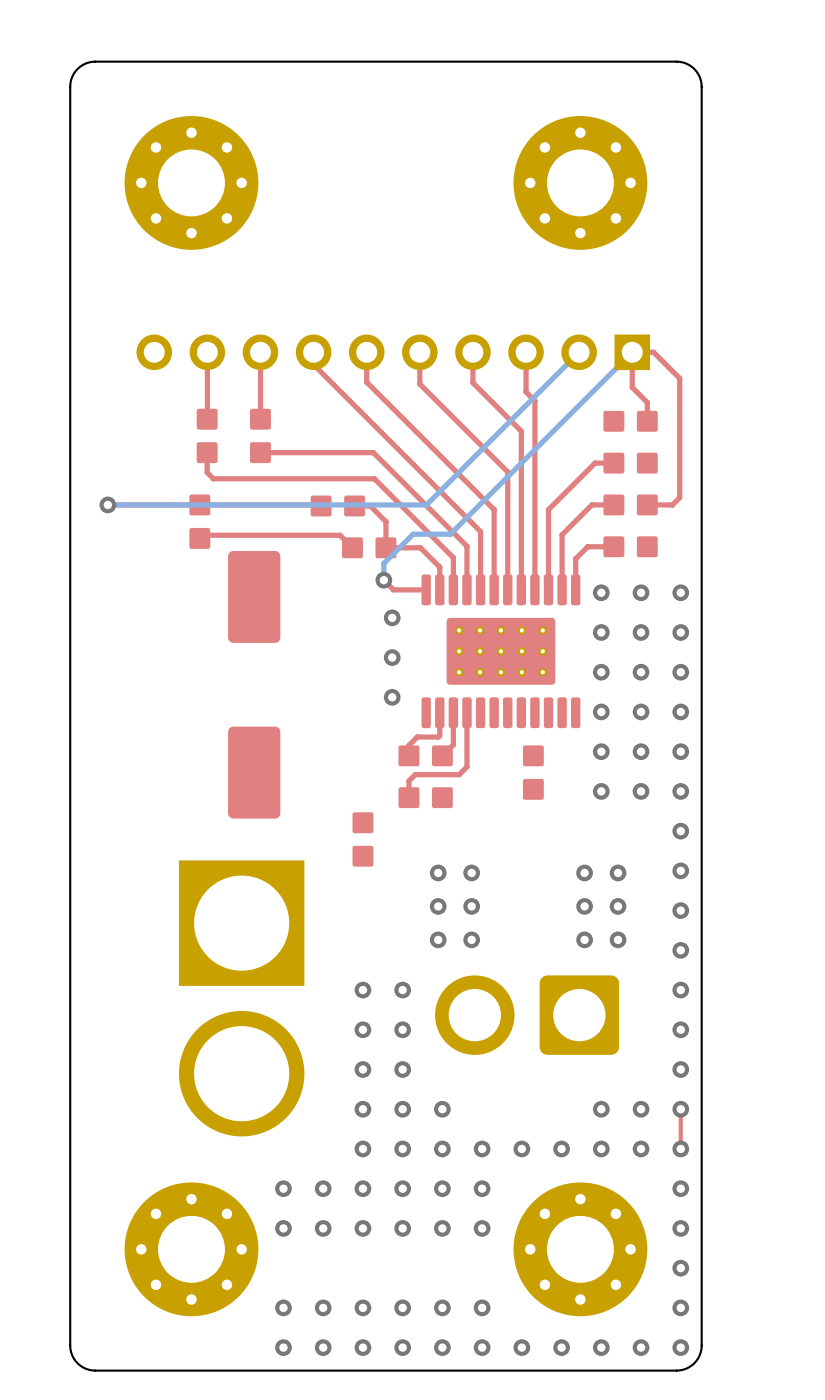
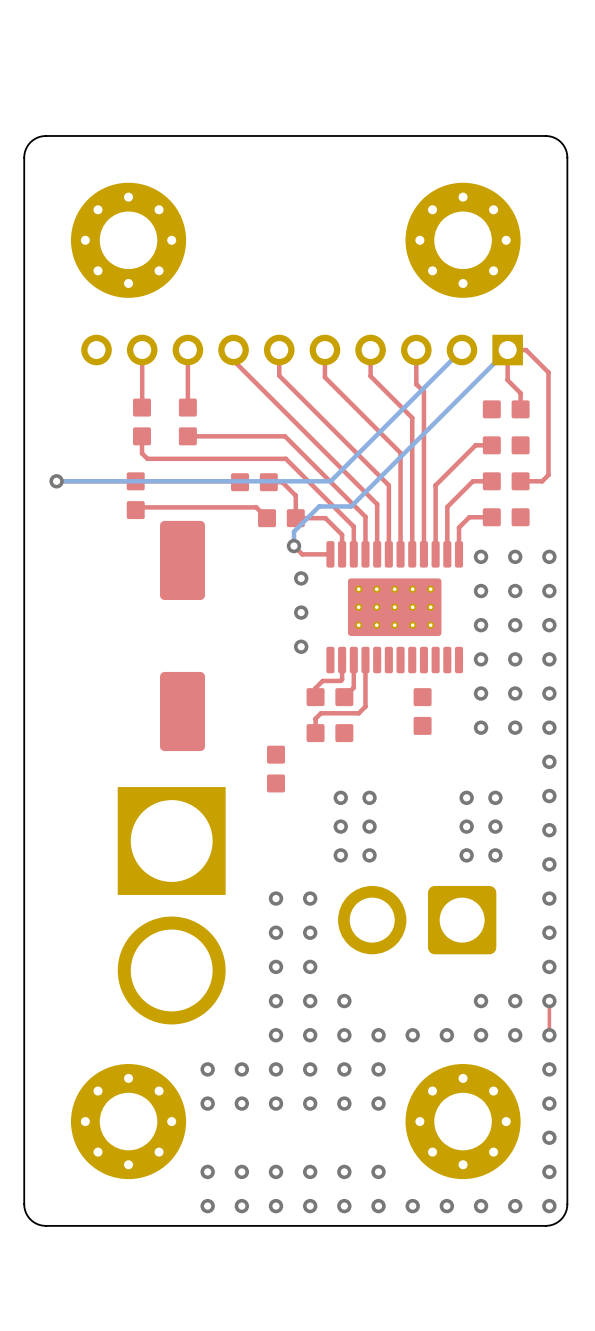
board edge: (701, 128) (701, 86) (699, 77) (691, 66) (676, 61) (92, 61) (80, 66) (71, 80) (70, 128) -> (567, 157) (565, 149) (561, 142) (554, 137) (545, 135) (45, 135) (37, 137) (30, 142) (25, 149) (24, 157)
part position: (191, 182) -> (128, 240)
part position: (580, 182) -> (463, 240)

